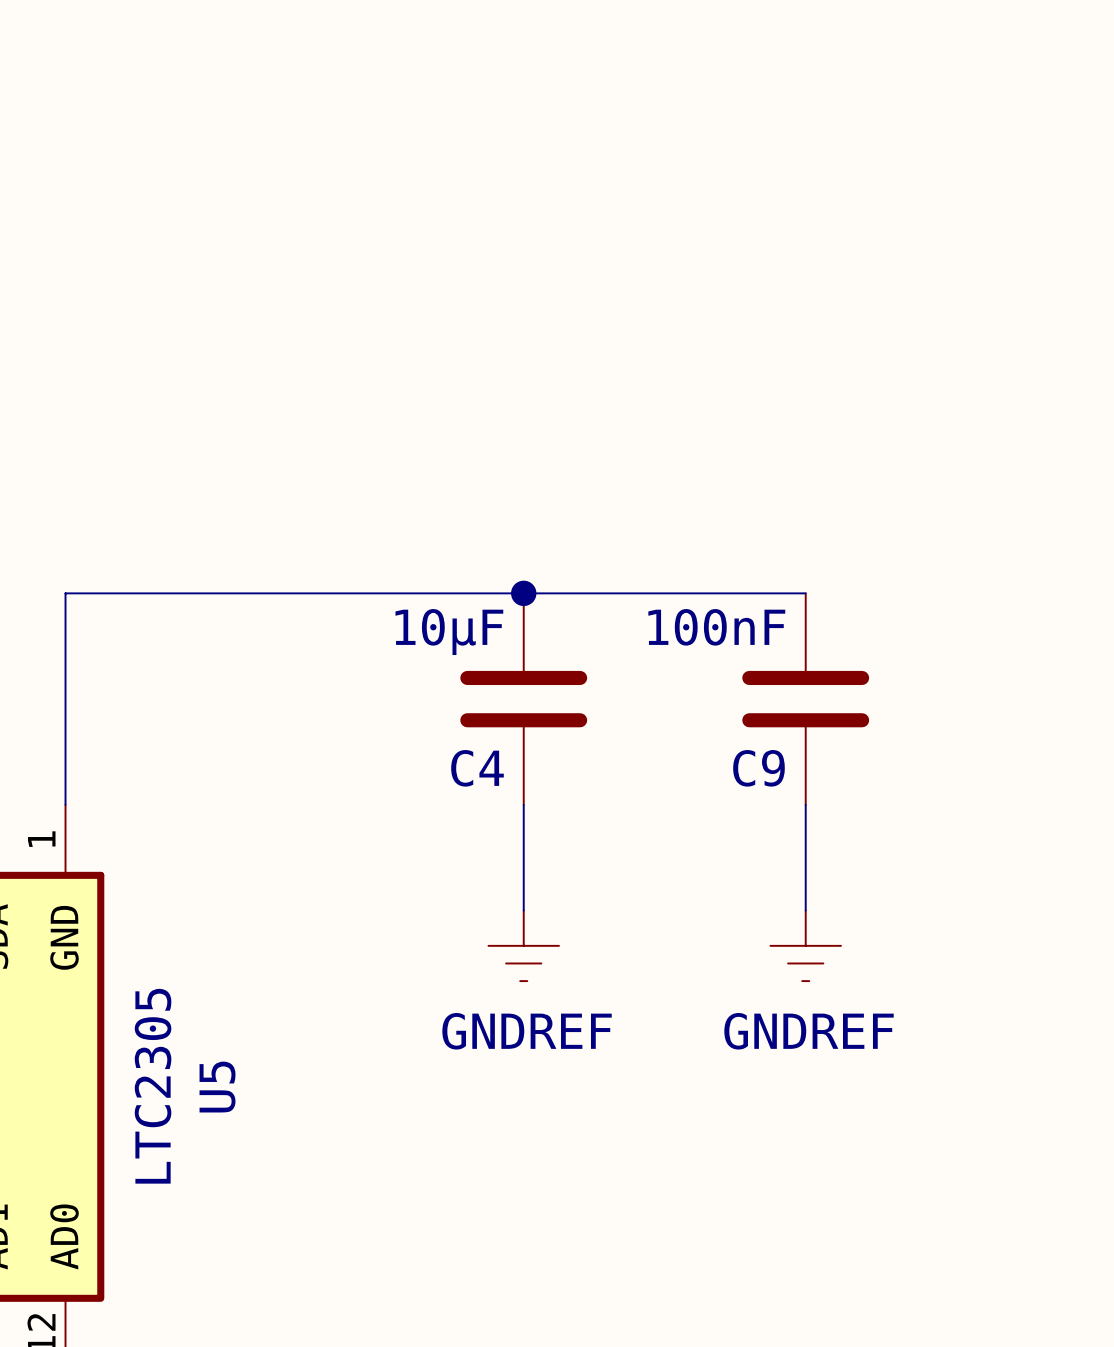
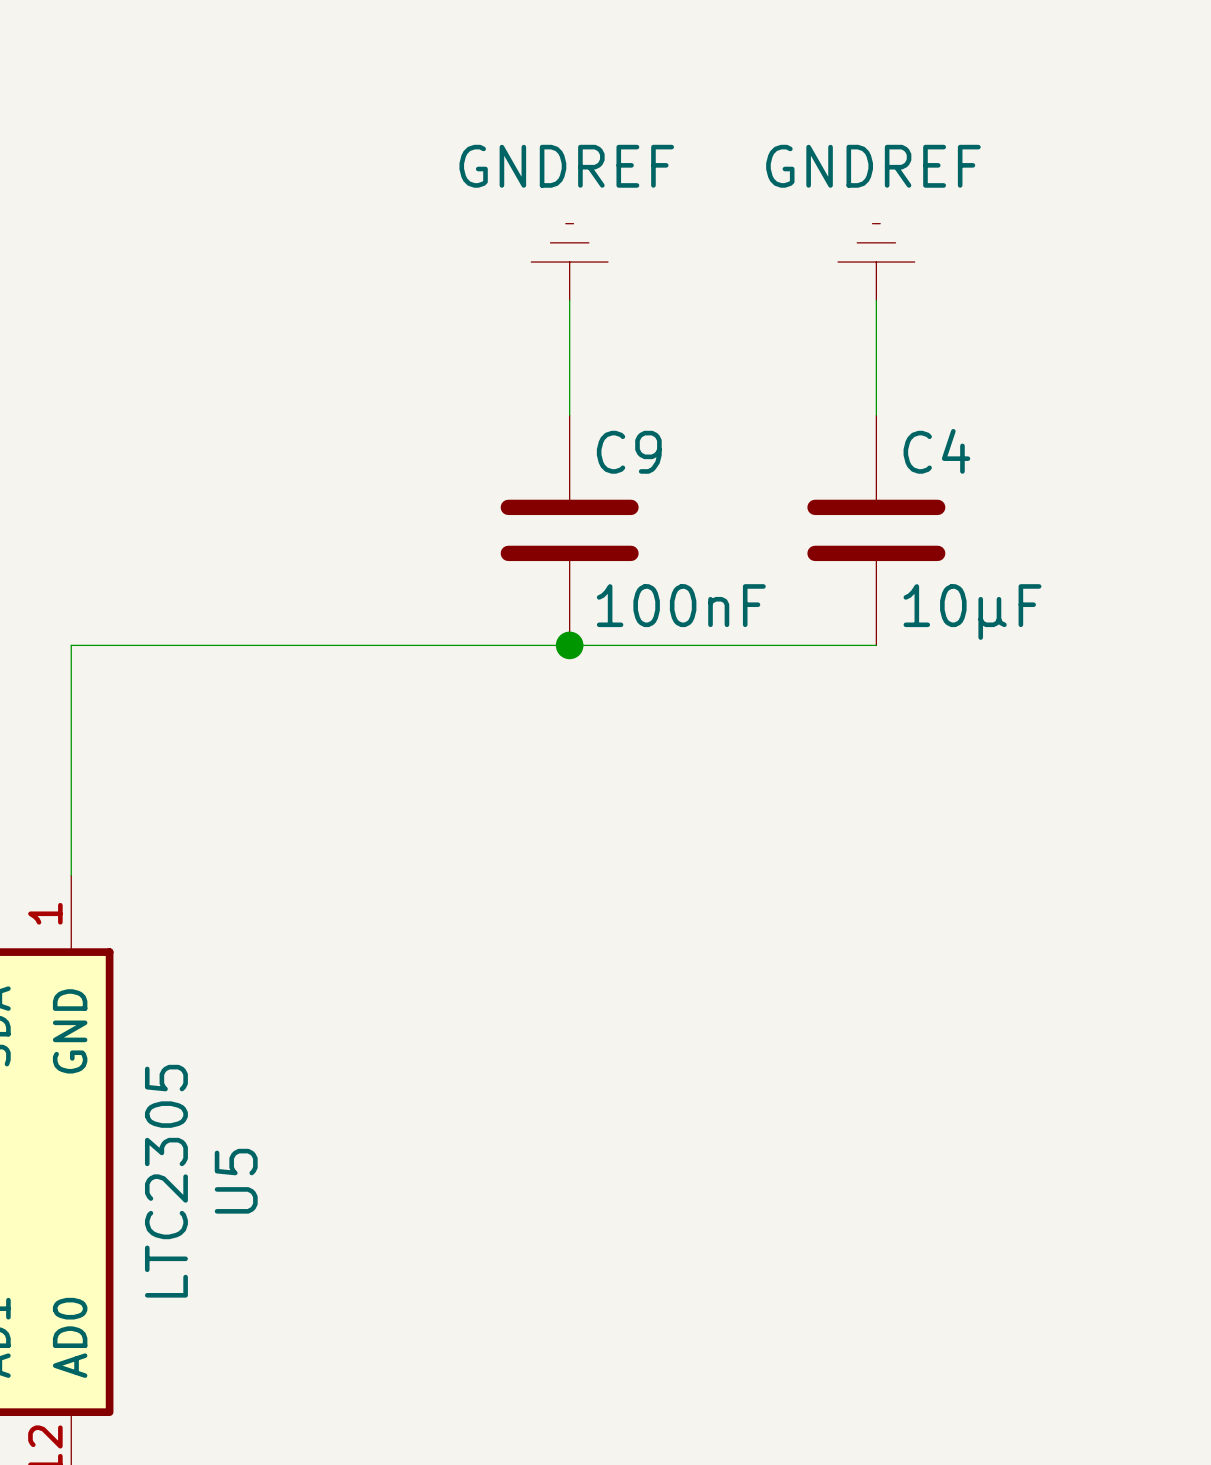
power symbol: none -> GNDREF (569, 262)
power symbol: none -> GNDREF (876, 262)
C9 value position: 100nF (716, 627) -> 100nF (681, 605)
C4 value position: 10µF (449, 632) -> 10µF (972, 612)
C4 position: (523, 699) -> (876, 530)
C9 position: (805, 699) -> (569, 530)
C4 name position: C4 (477, 768) -> C4 (936, 451)
C9 name position: C9 (758, 768) -> C9 (629, 452)
wire: (523, 804) (523, 910) -> (569, 300) (569, 415)
wire: (805, 804) (805, 910) -> (876, 300) (876, 415)
power symbol: GNDREF (523, 945) -> none
power symbol: GNDREF (805, 945) -> none

